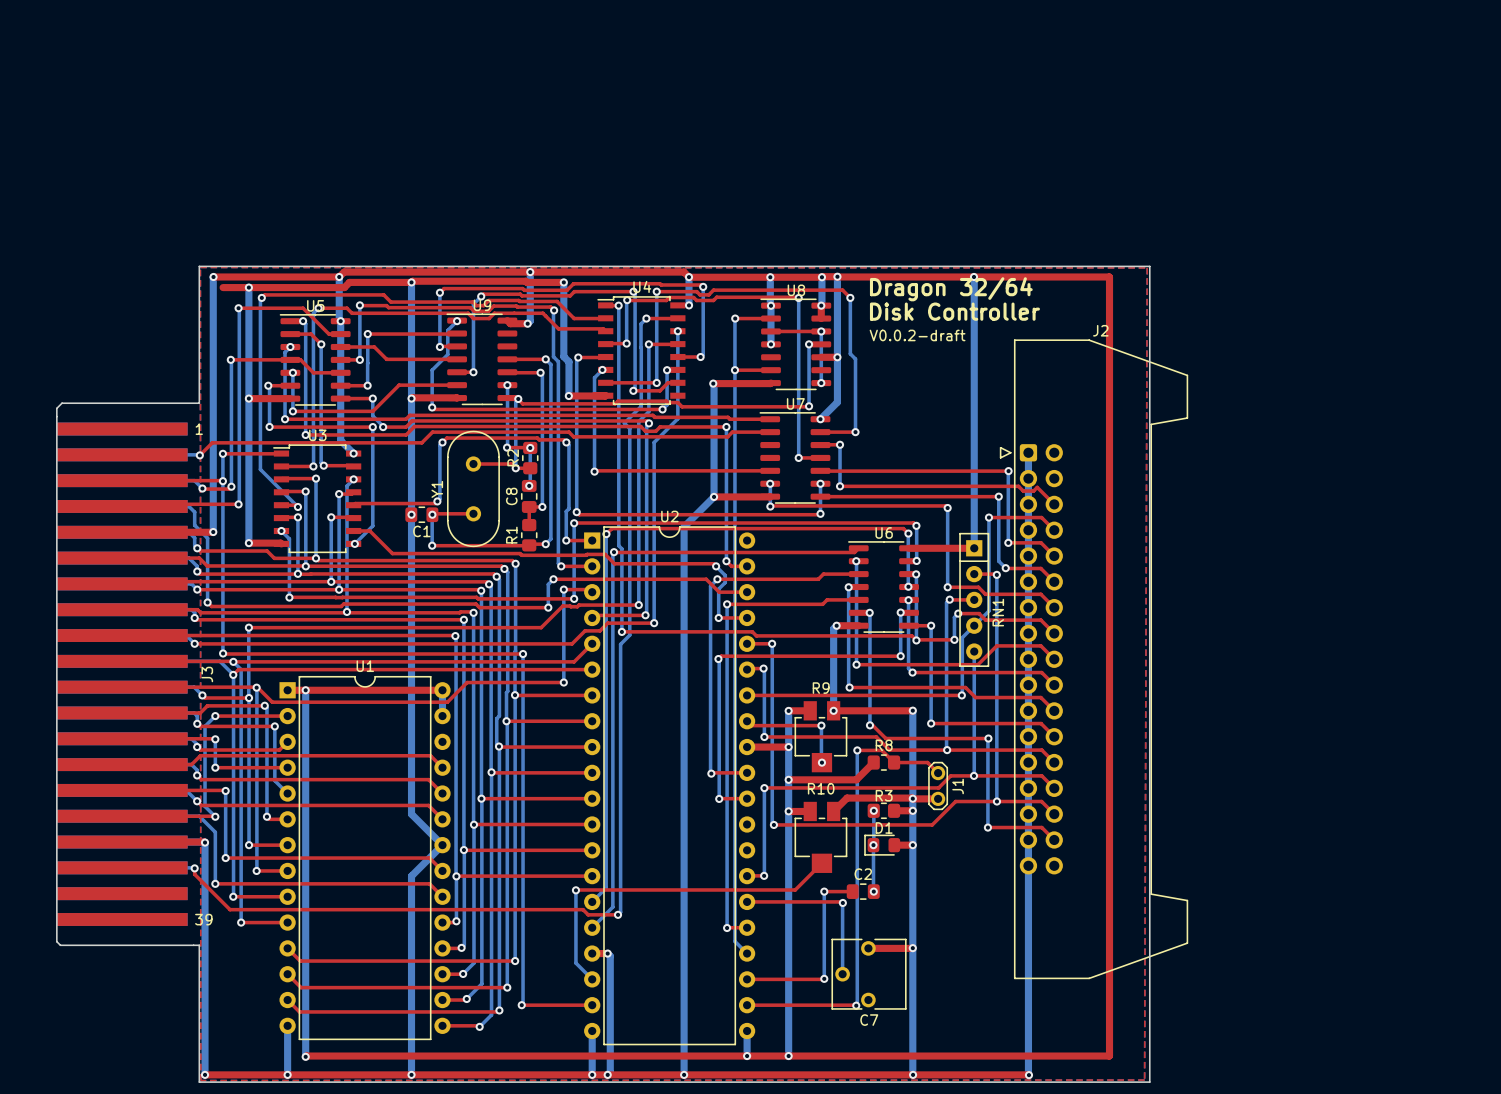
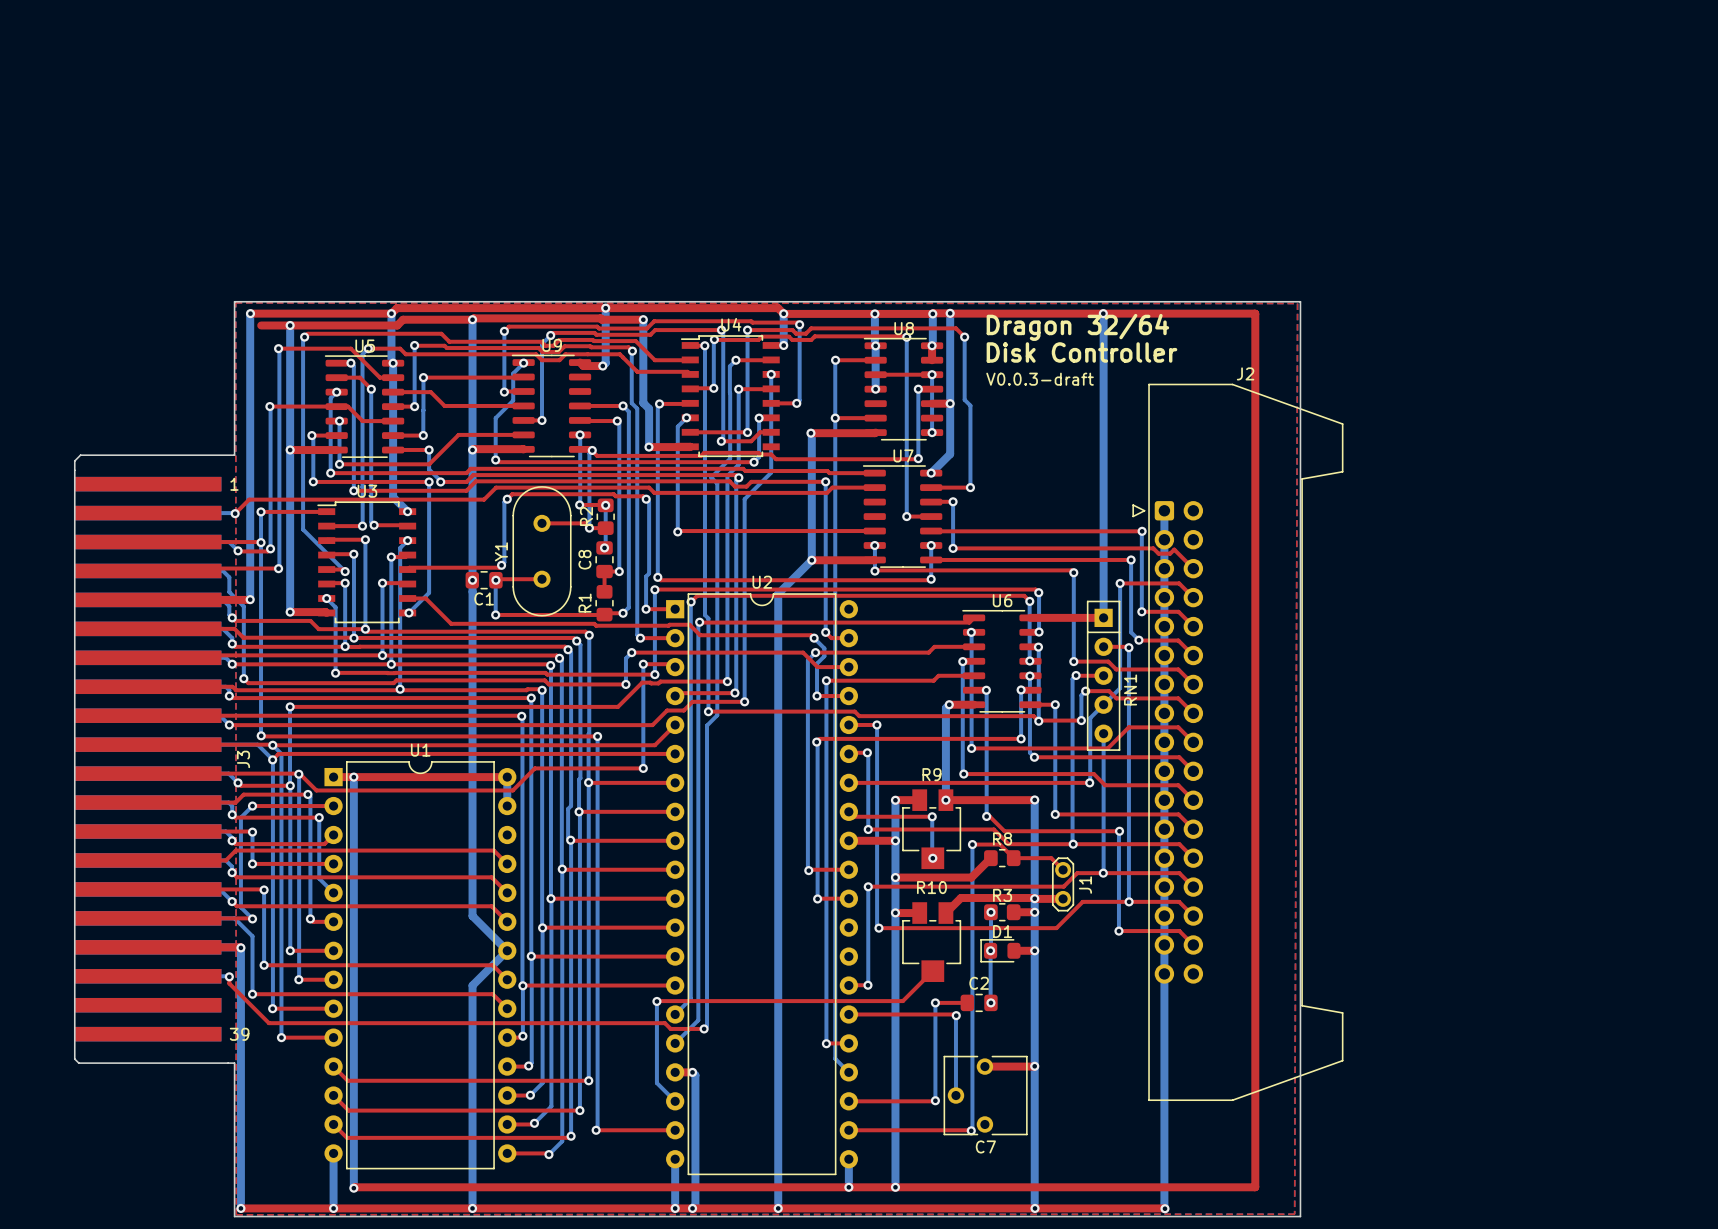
text: V0.0.2-draft (917, 335) -> V0.0.3-draft (1040, 379)

